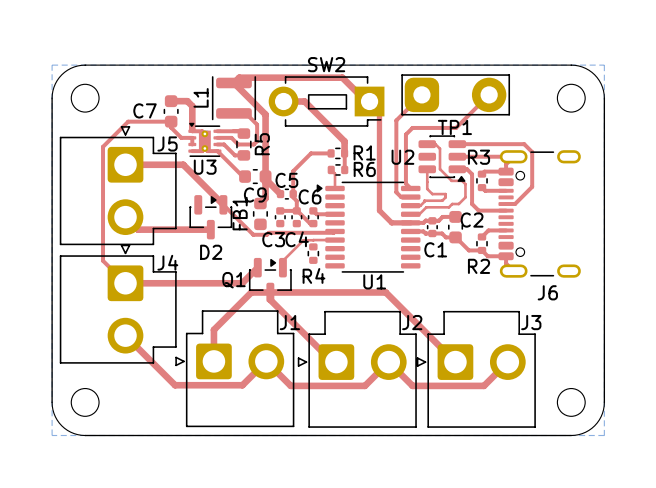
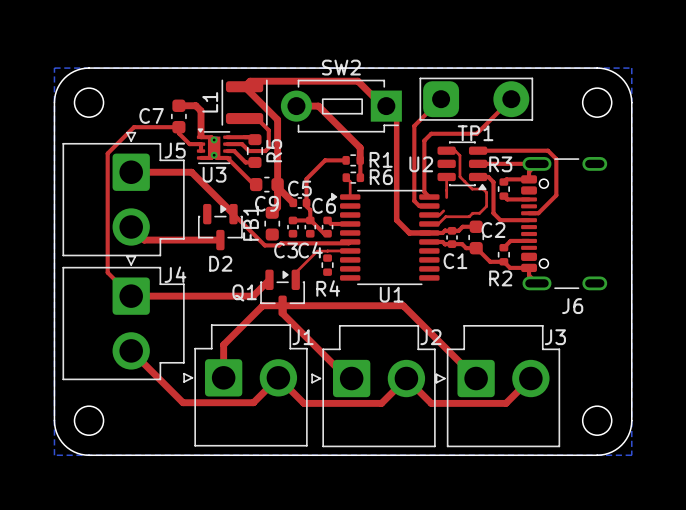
top track: (427, 188) (432, 194) (445, 194) (445, 197) (442, 200) (424, 201) -> none

